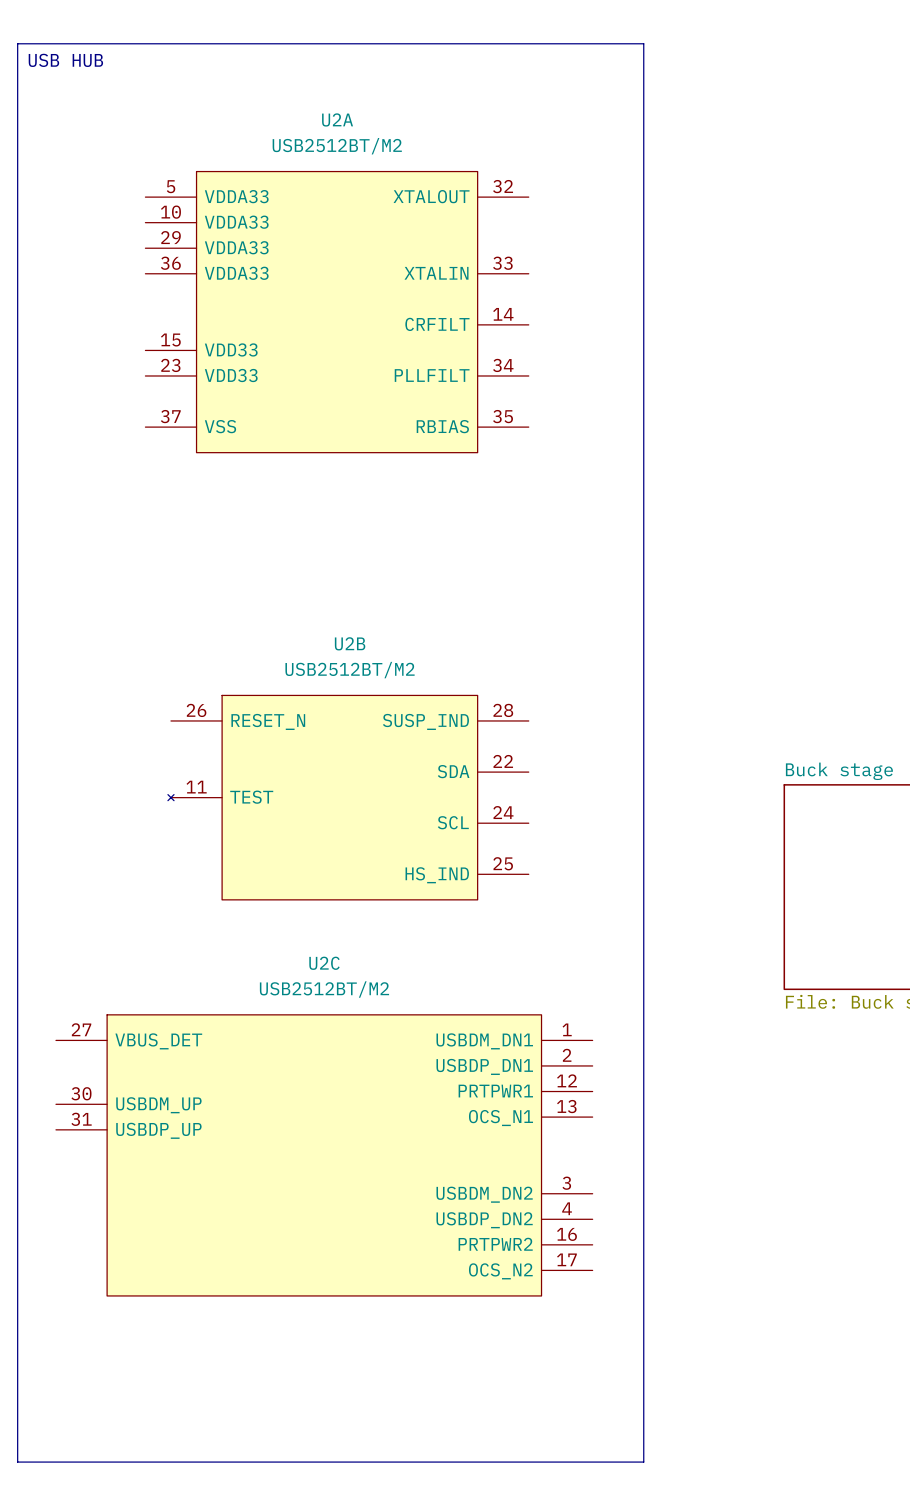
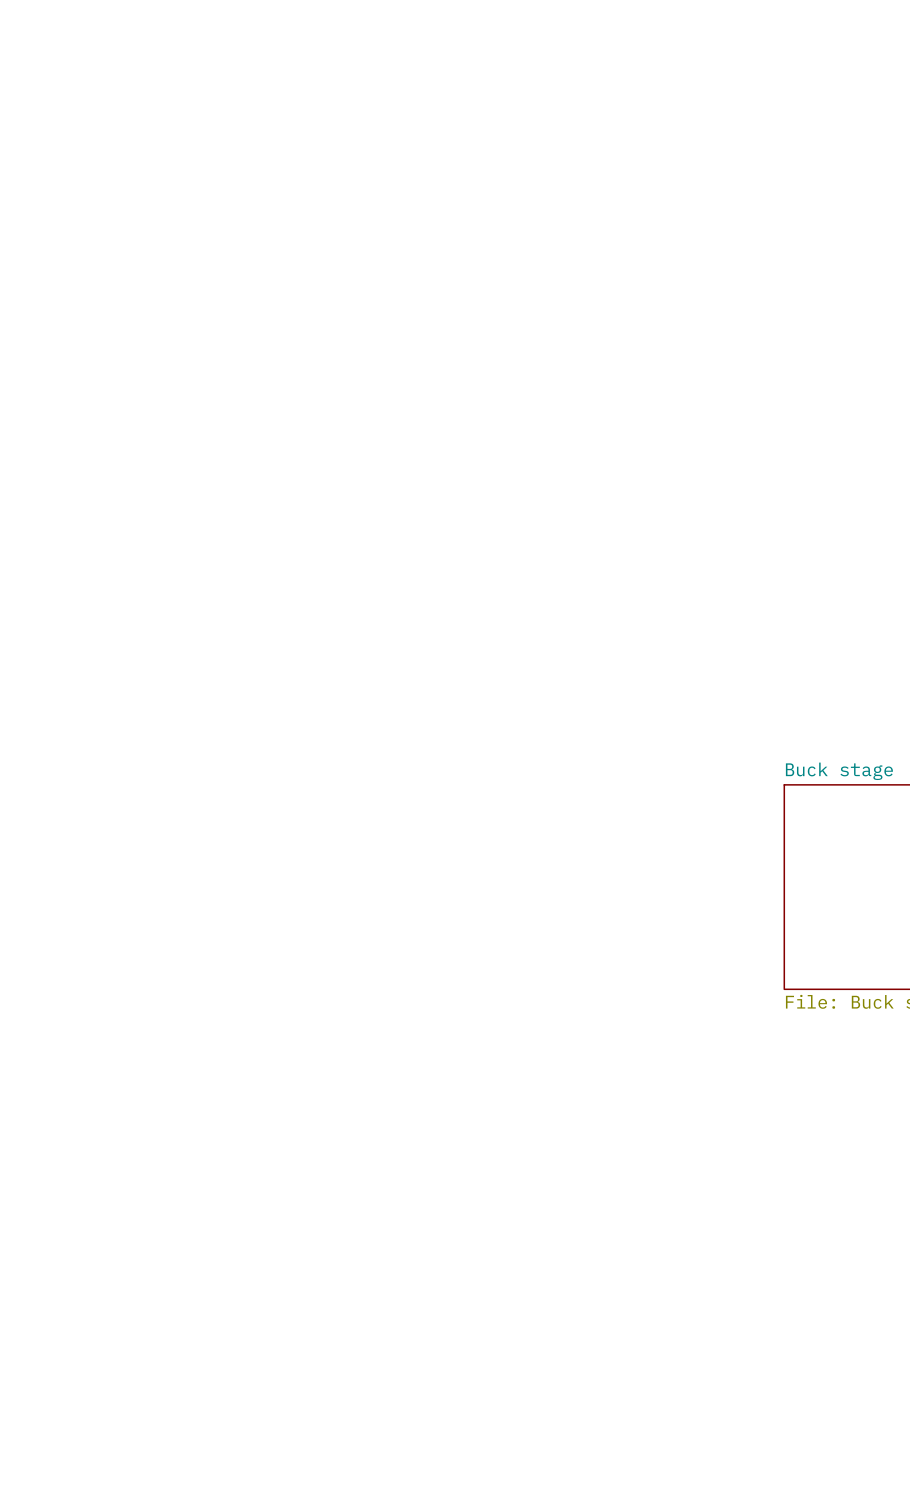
line: (17, 43) (643, 43) (643, 1462) (17, 1462) (17, 43) -> none
text: USB HUB (65, 60) -> none
U2A: USB2512BT/M2 (337, 312) -> none
U2B: USB2512BT/M2 (348, 797) -> none
U2C: USB2512BT/M2 (324, 1155) -> none

